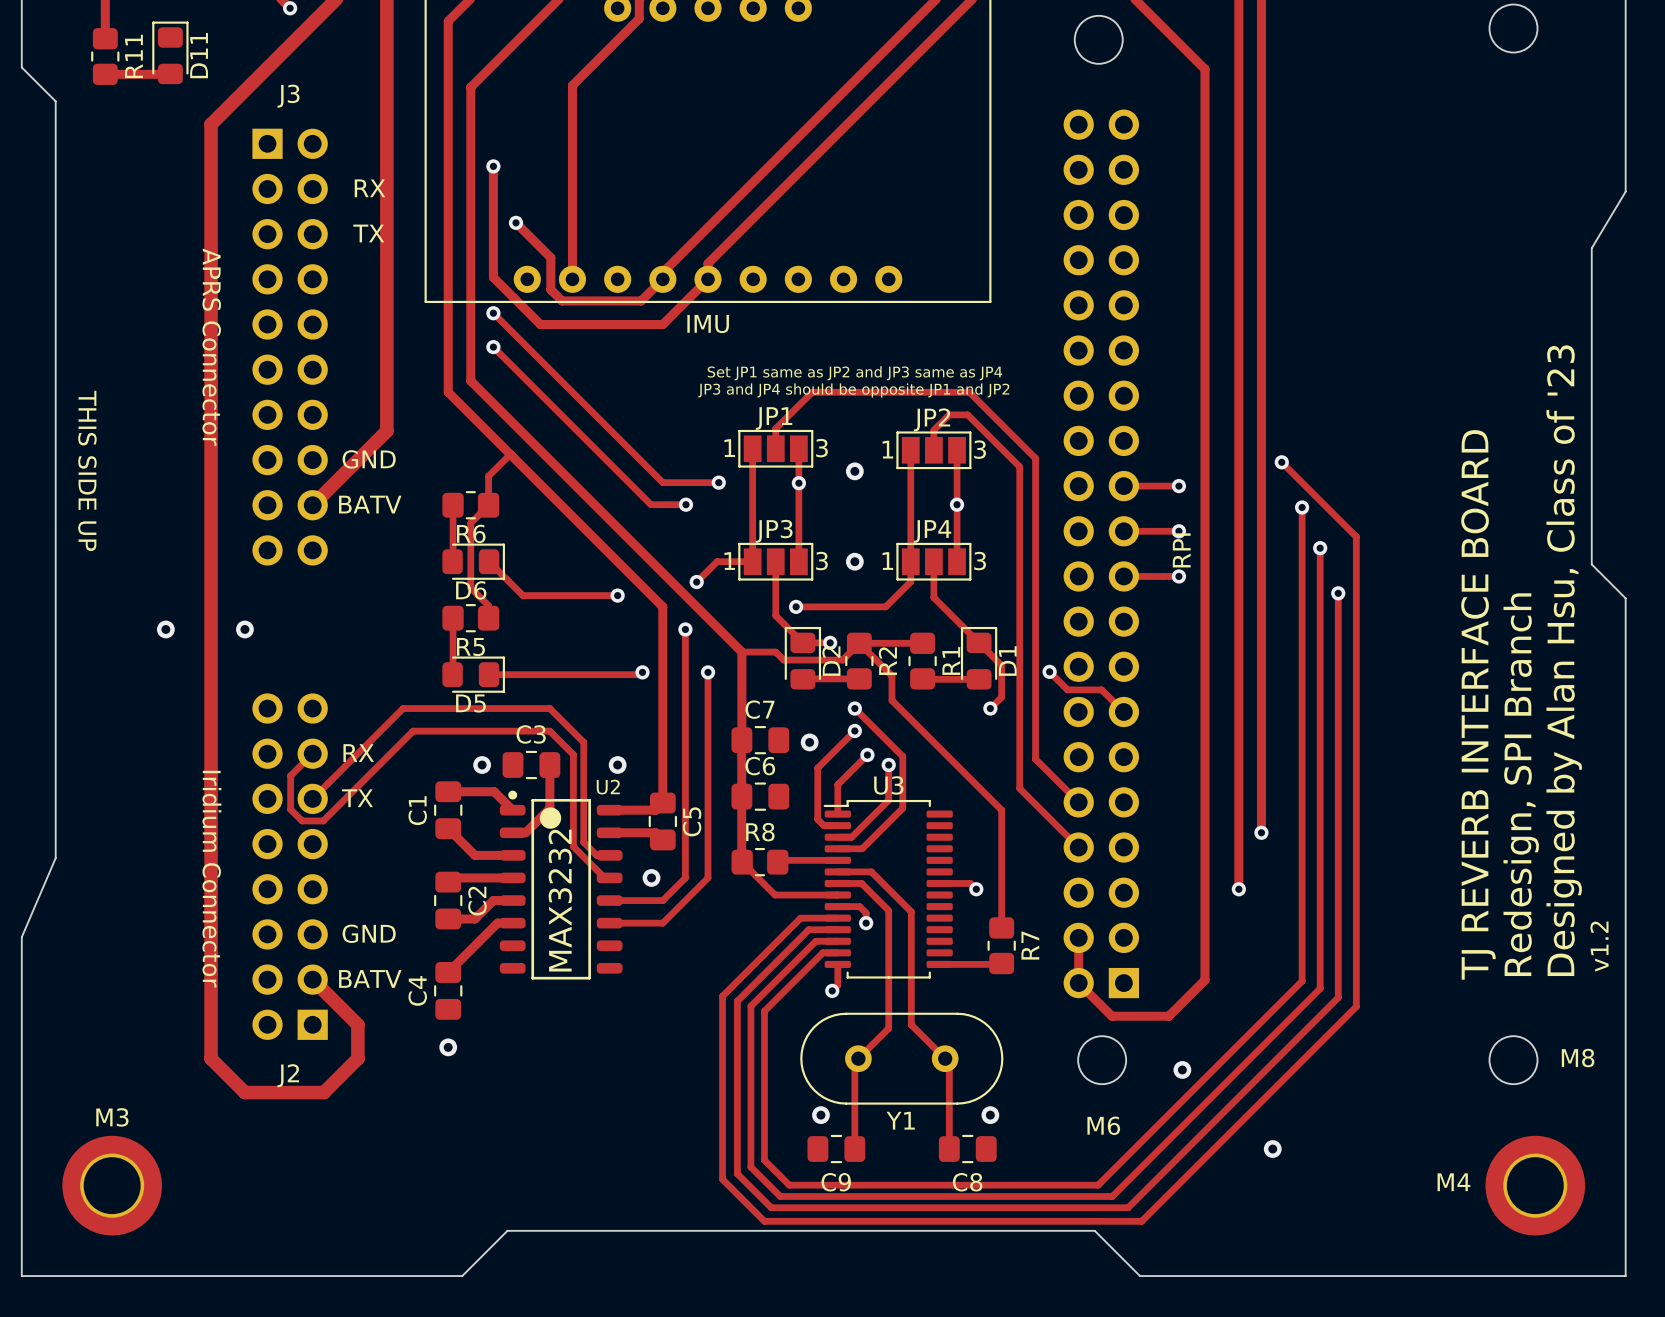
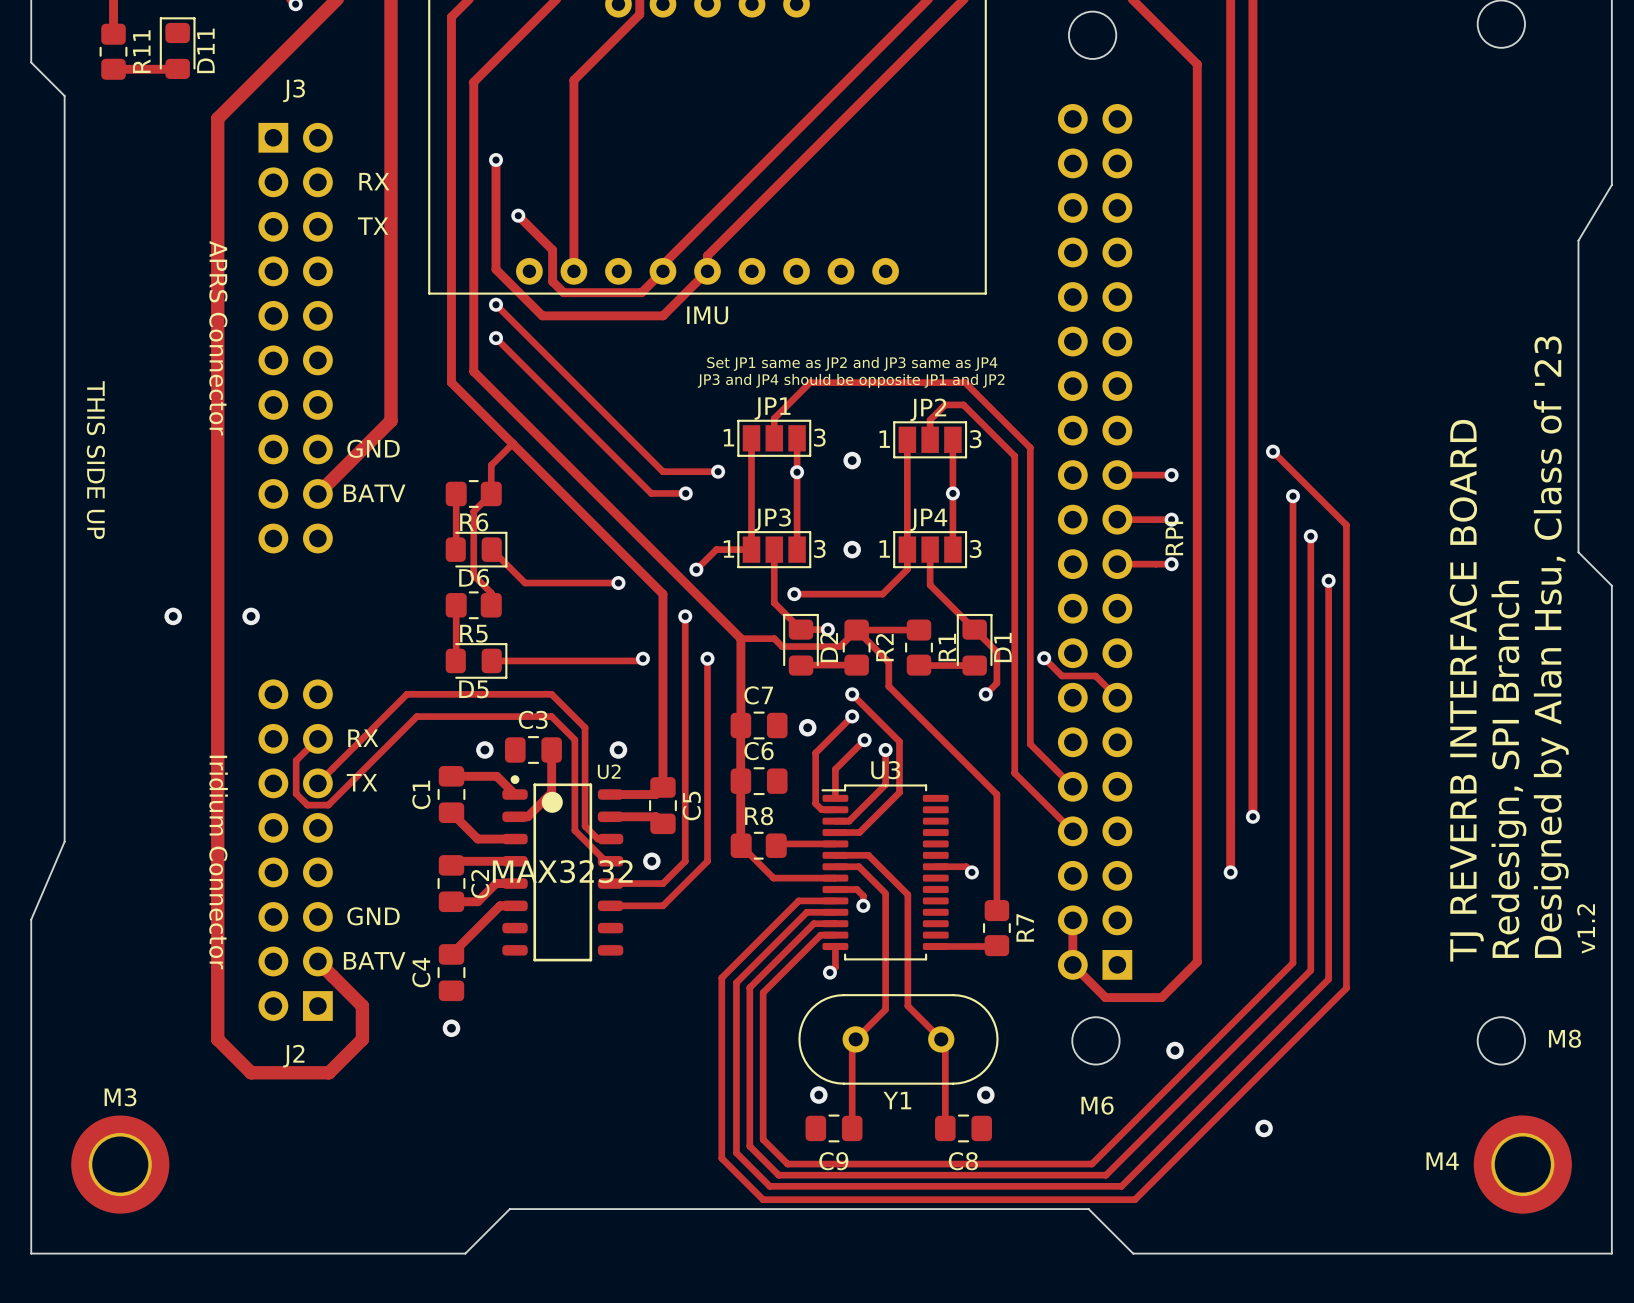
U2 value rotation: 0° (560, 900) -> 90° clockwise (562, 871)

